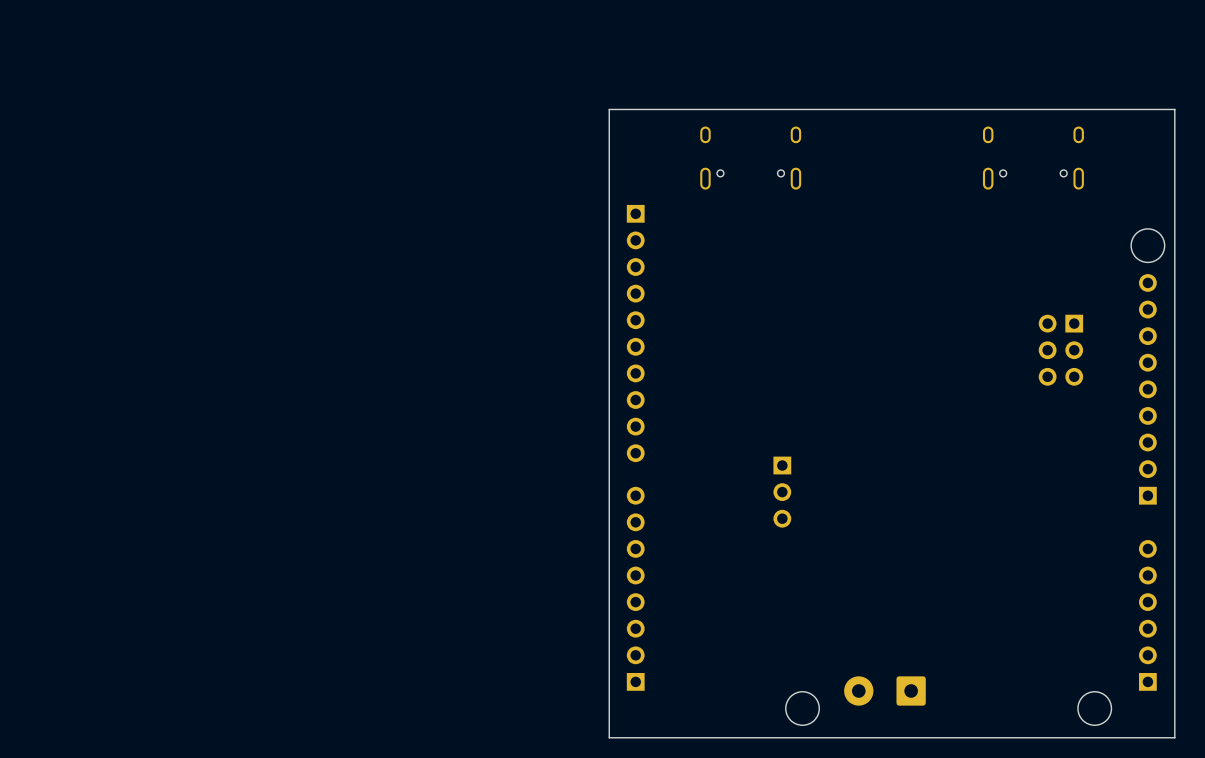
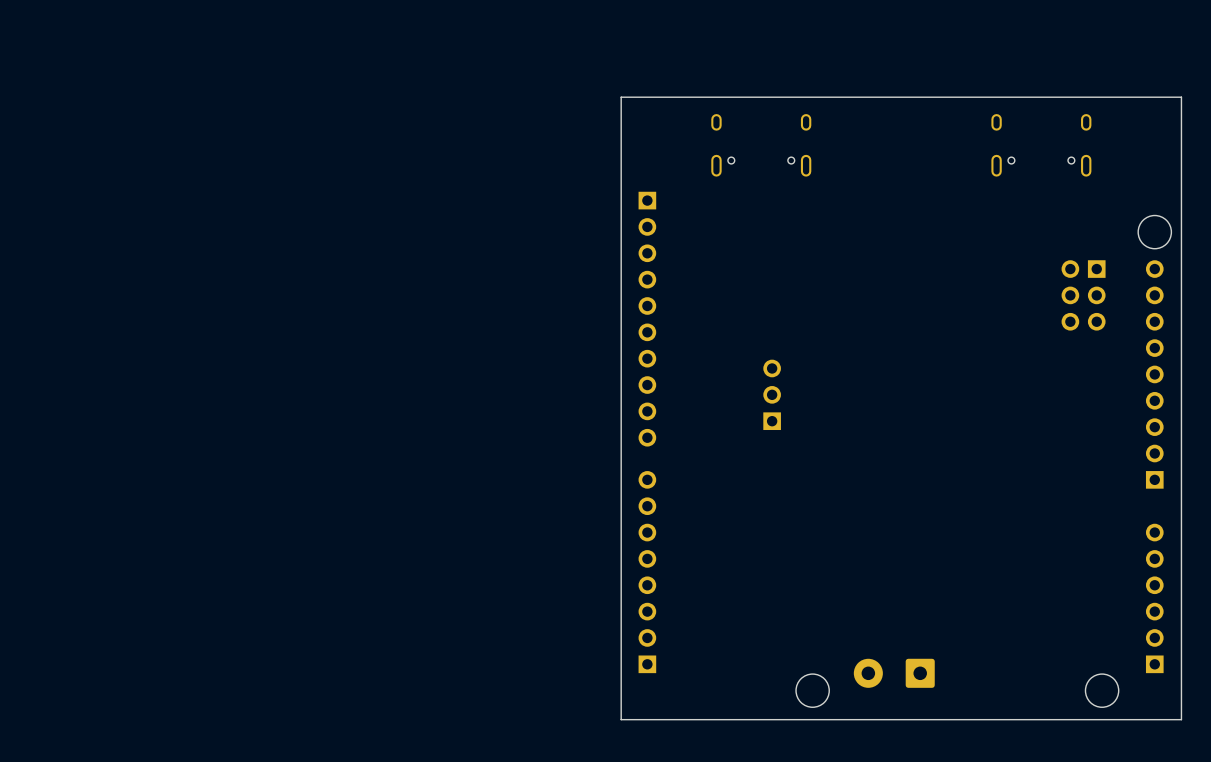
part position: (1060, 350) -> (1083, 295)
part rotation: 0° (782, 492) -> 180° (772, 394)
part position: (782, 492) -> (772, 394)

